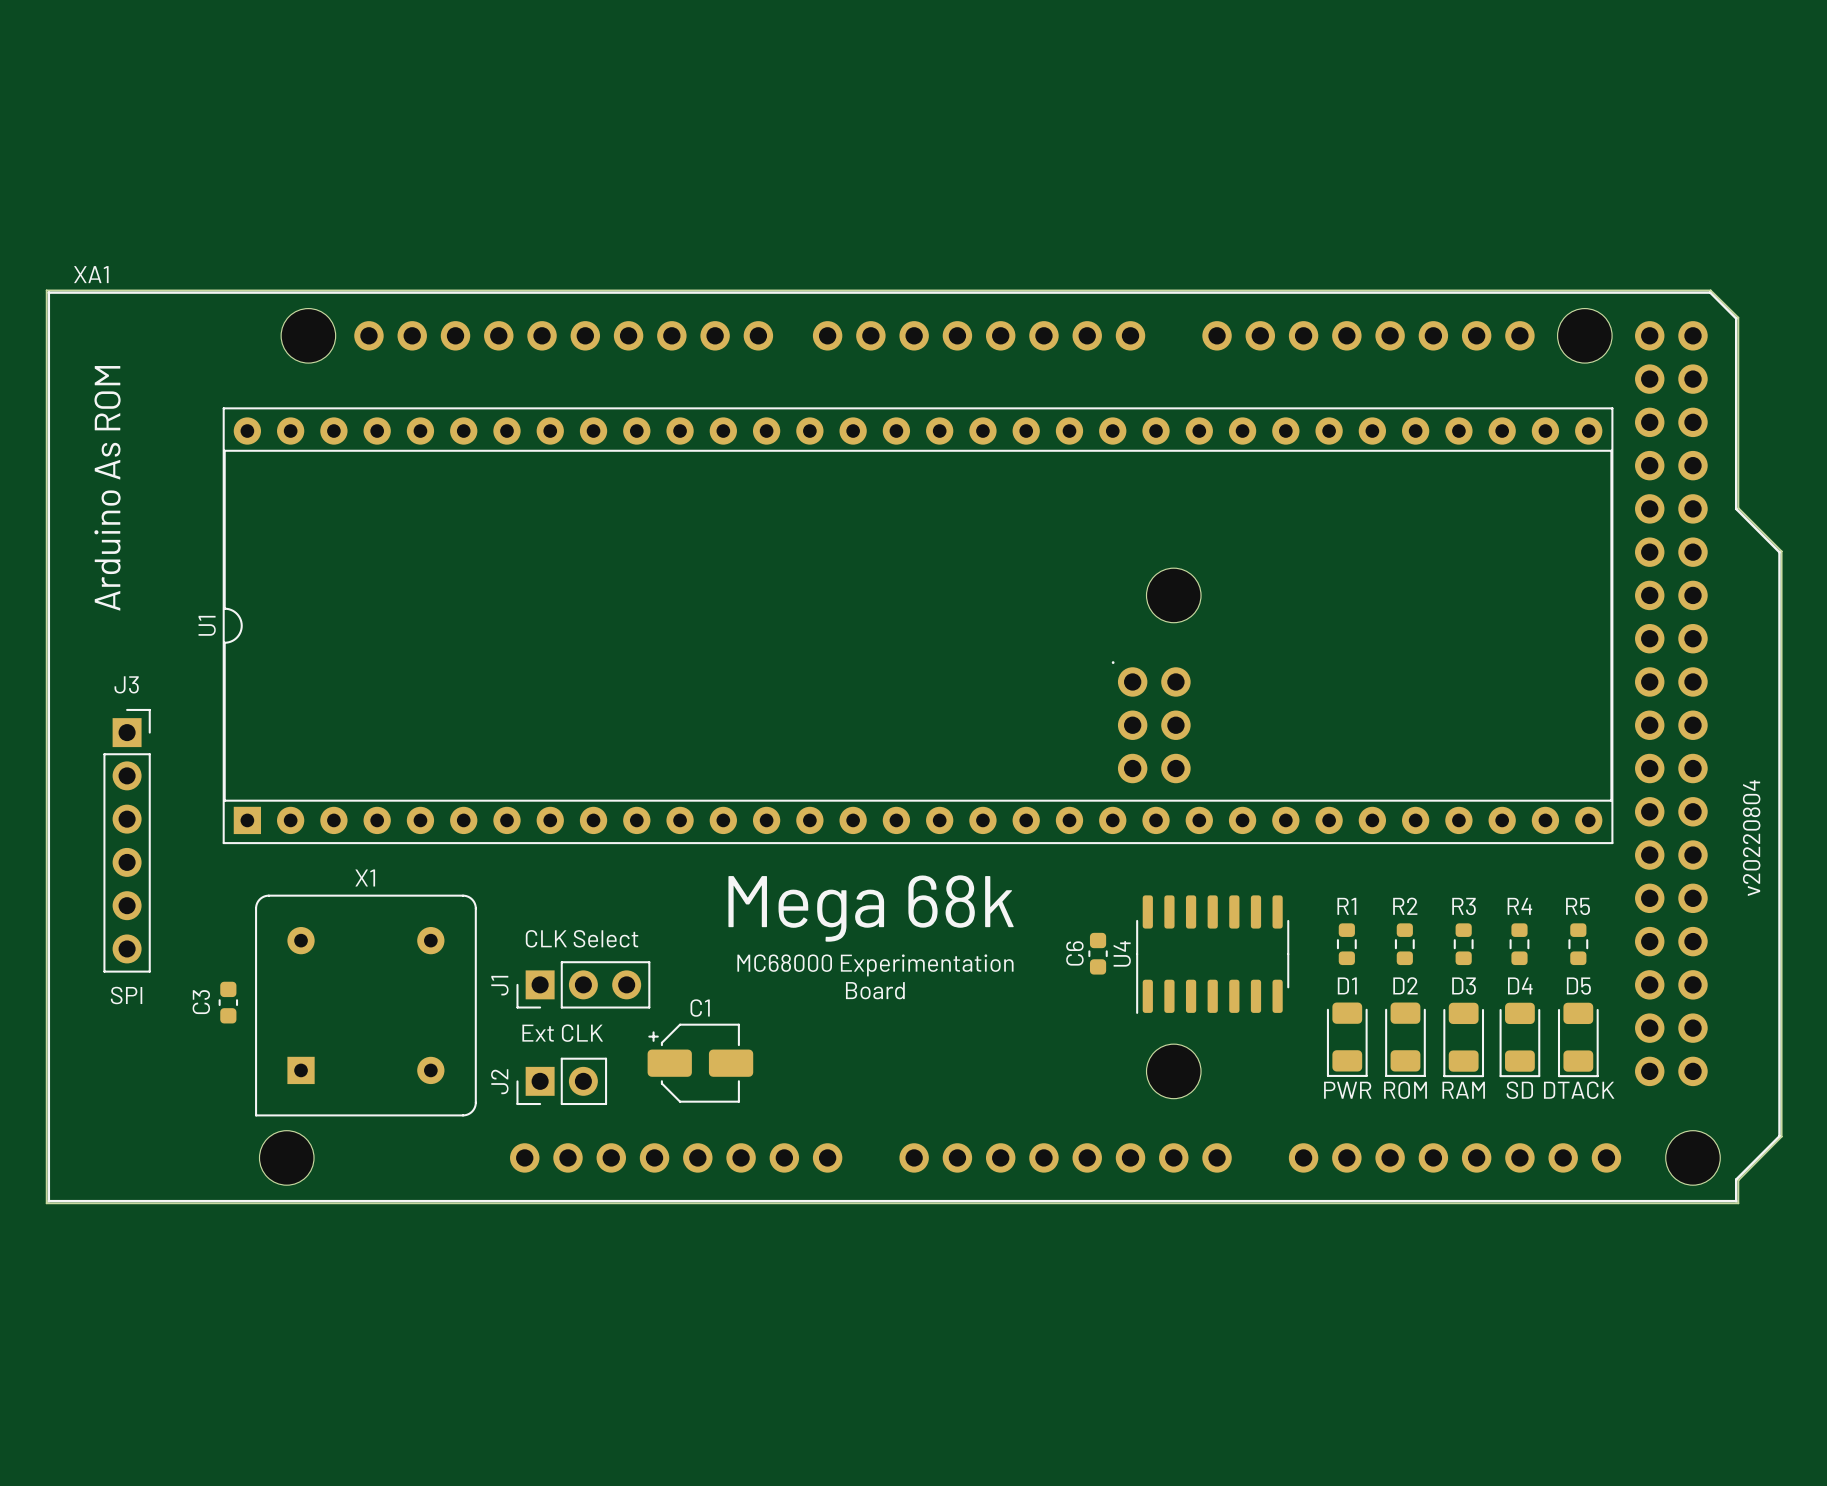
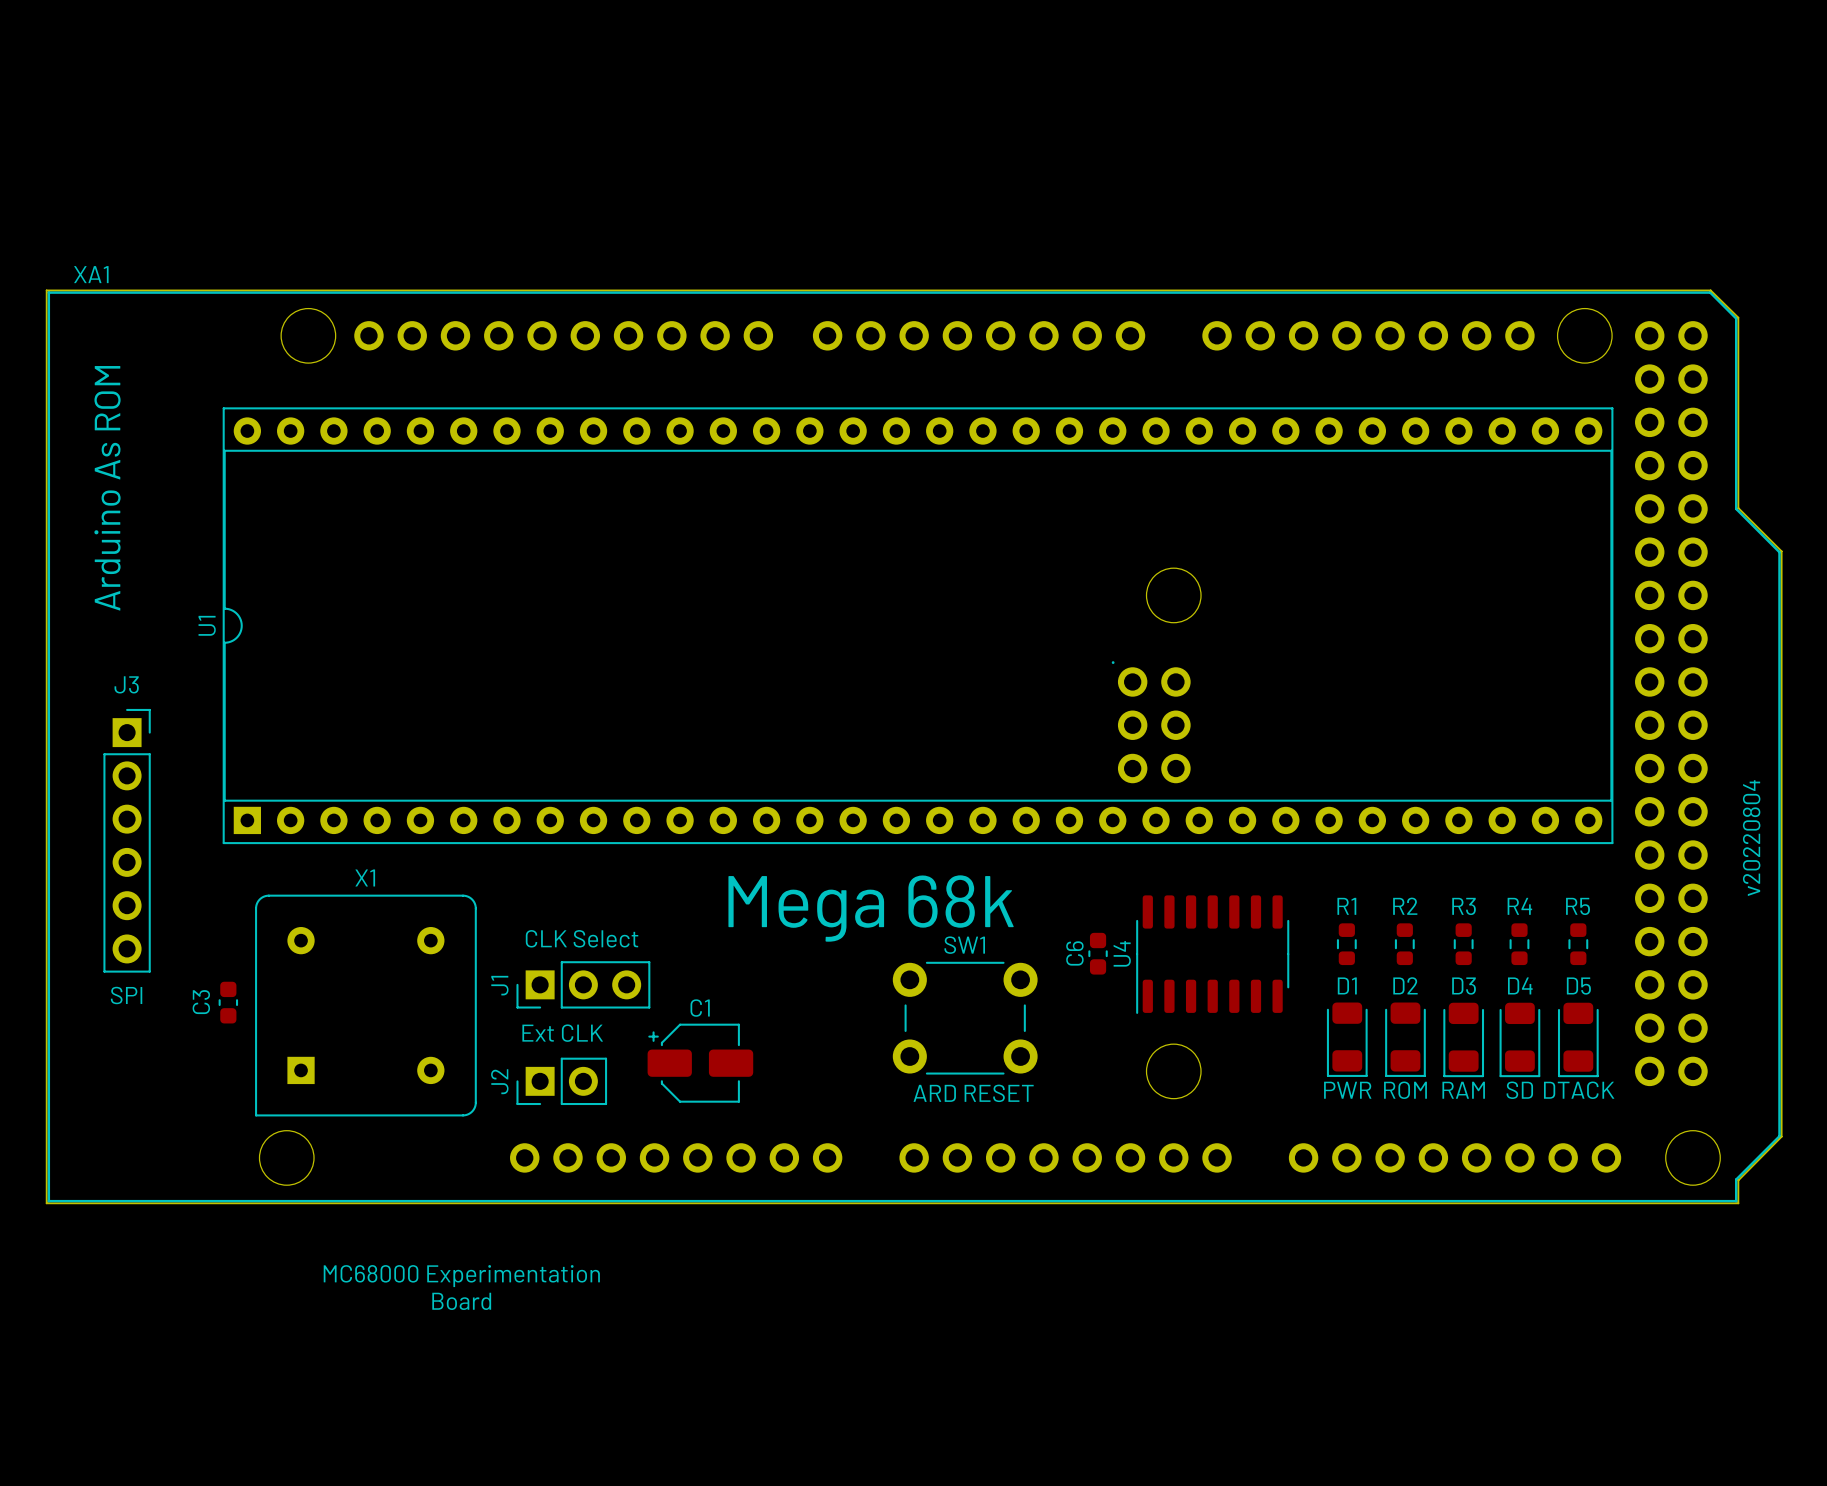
text: MC68000 Experimentation (875, 965) -> none
text: Board (875, 990) -> none
SW1: none -> ARD RESET (965, 1018)
text: none -> MC68000 Experimentation (461, 1276)
text: none -> Board (461, 1301)

